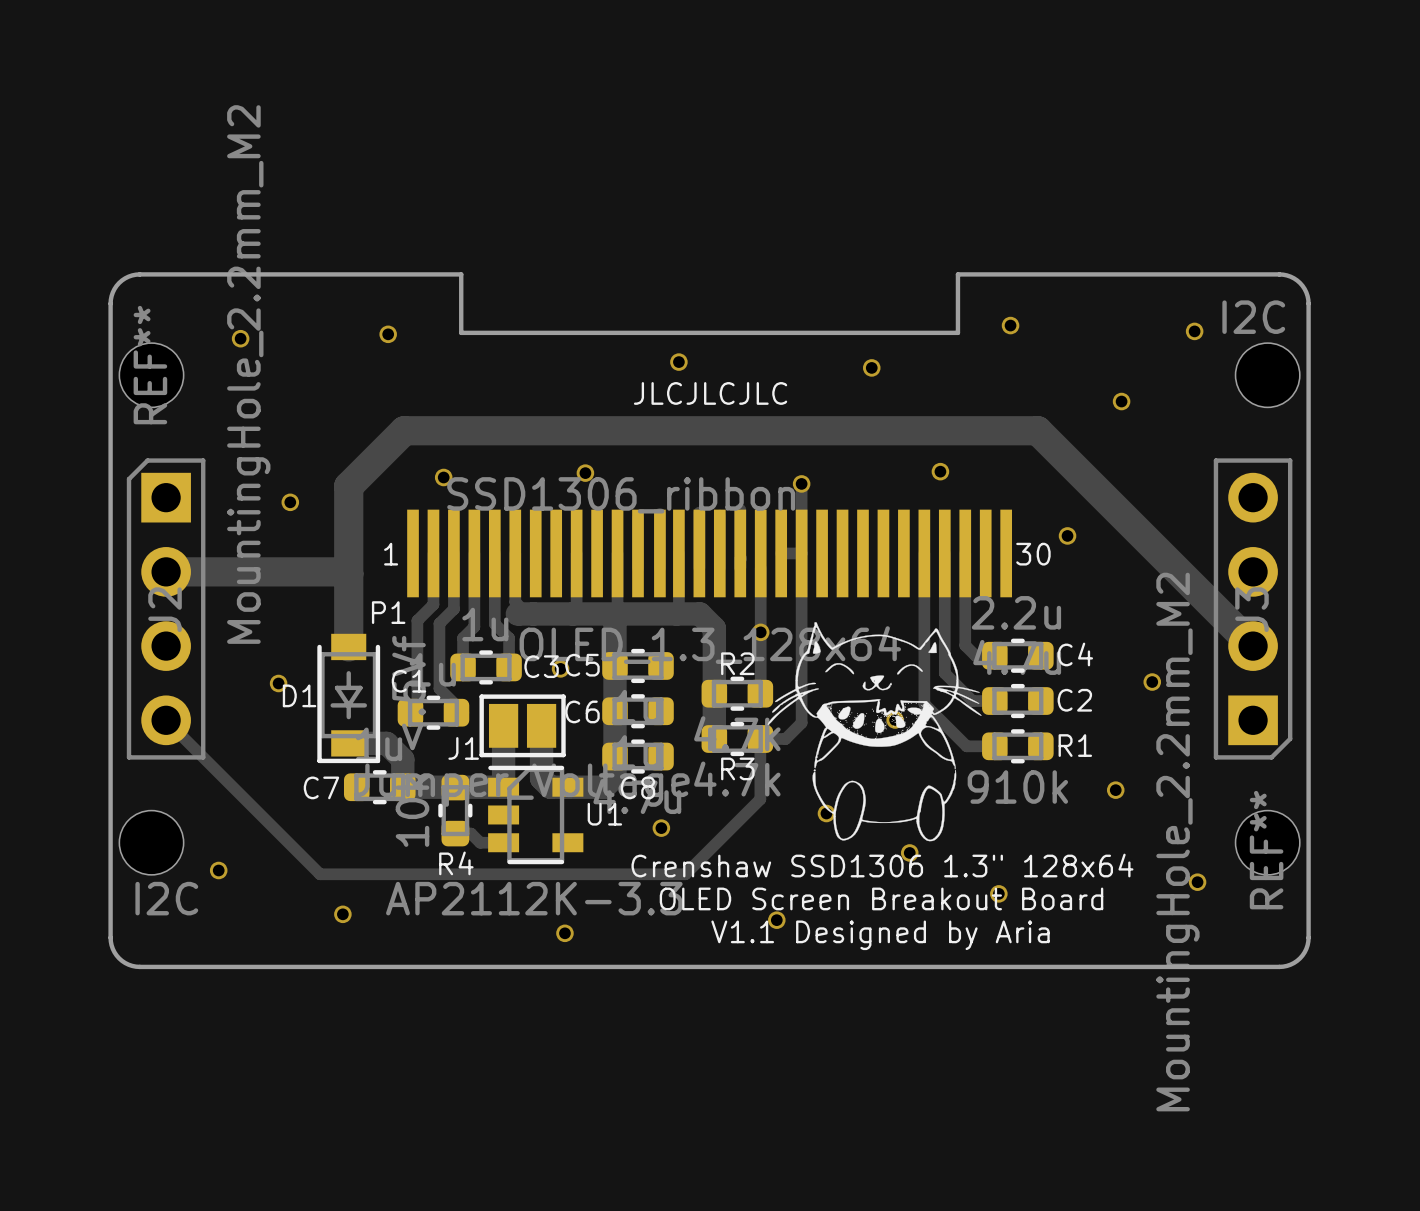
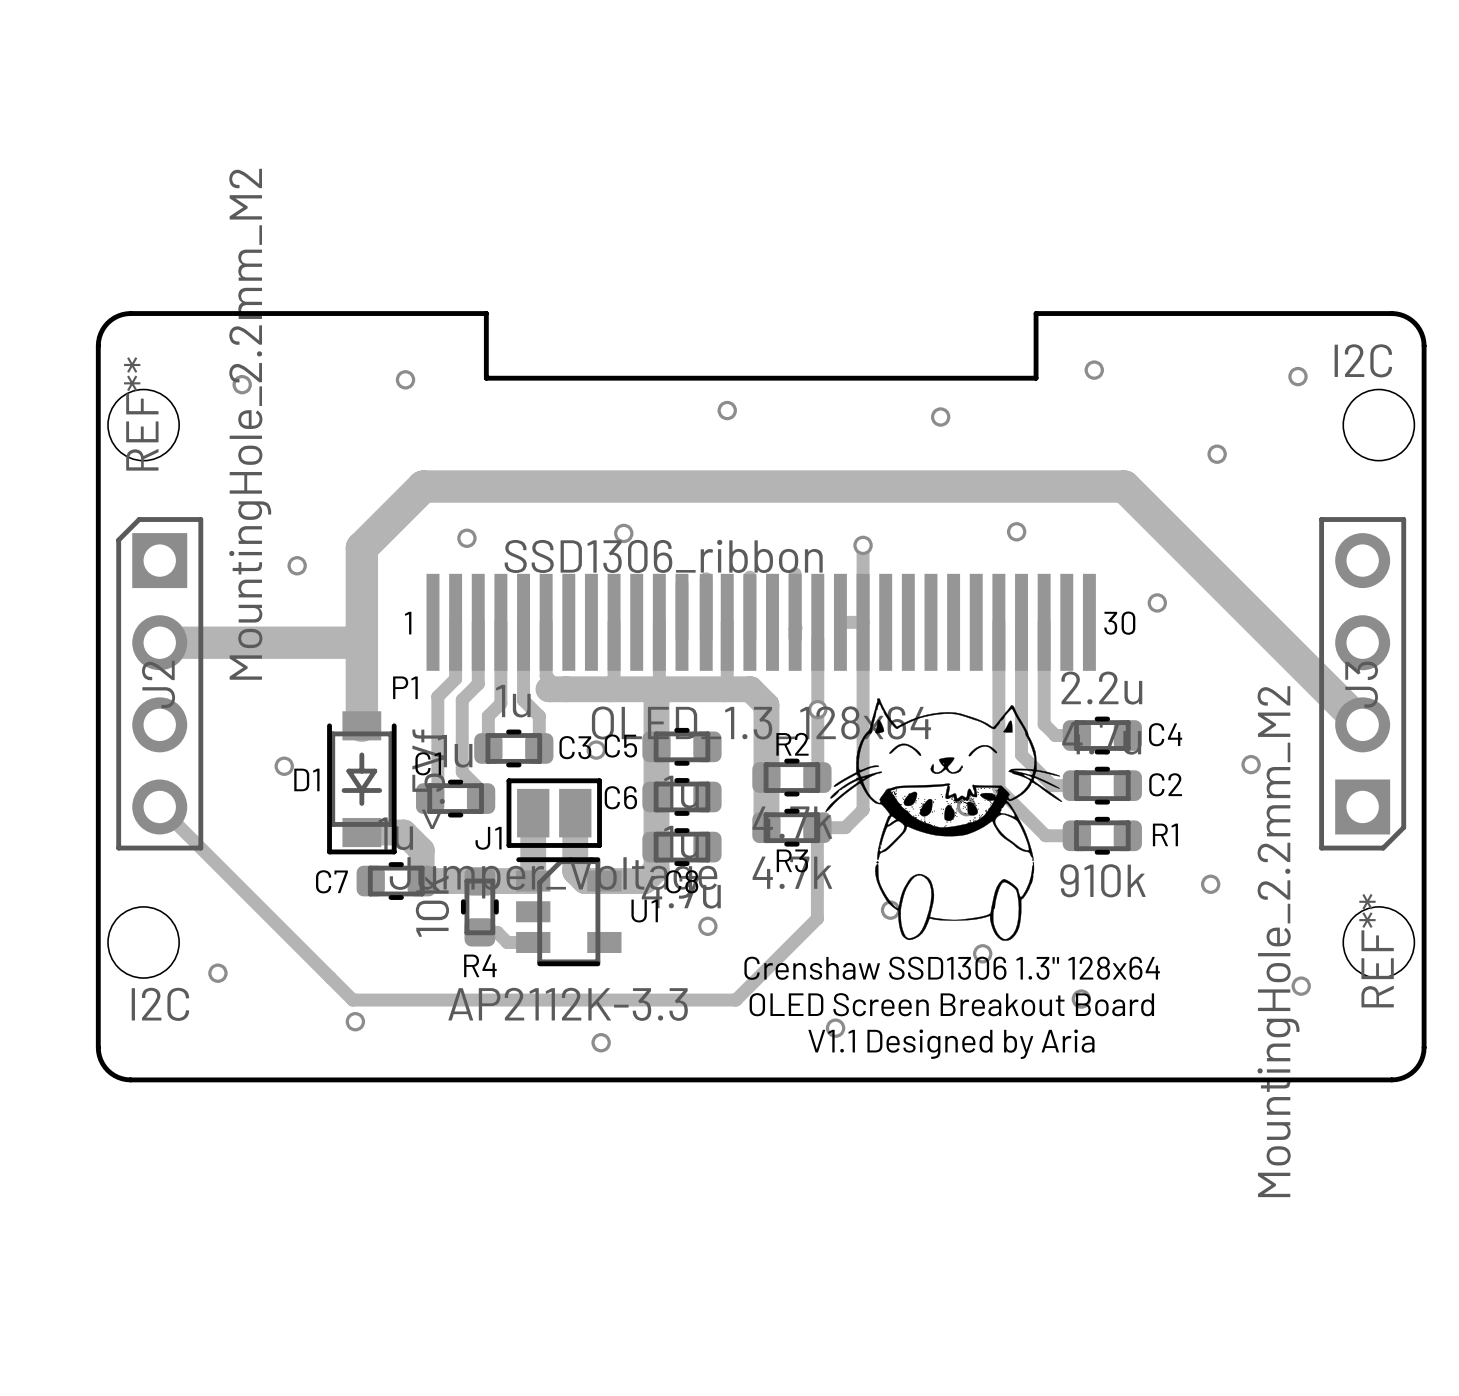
text: JLCJLCJLC (710, 393) -> none
track: (760, 799) (685, 874) (320, 874) -> (817, 894) (817, 918) (735, 1000) (352, 1000) (330, 977)

